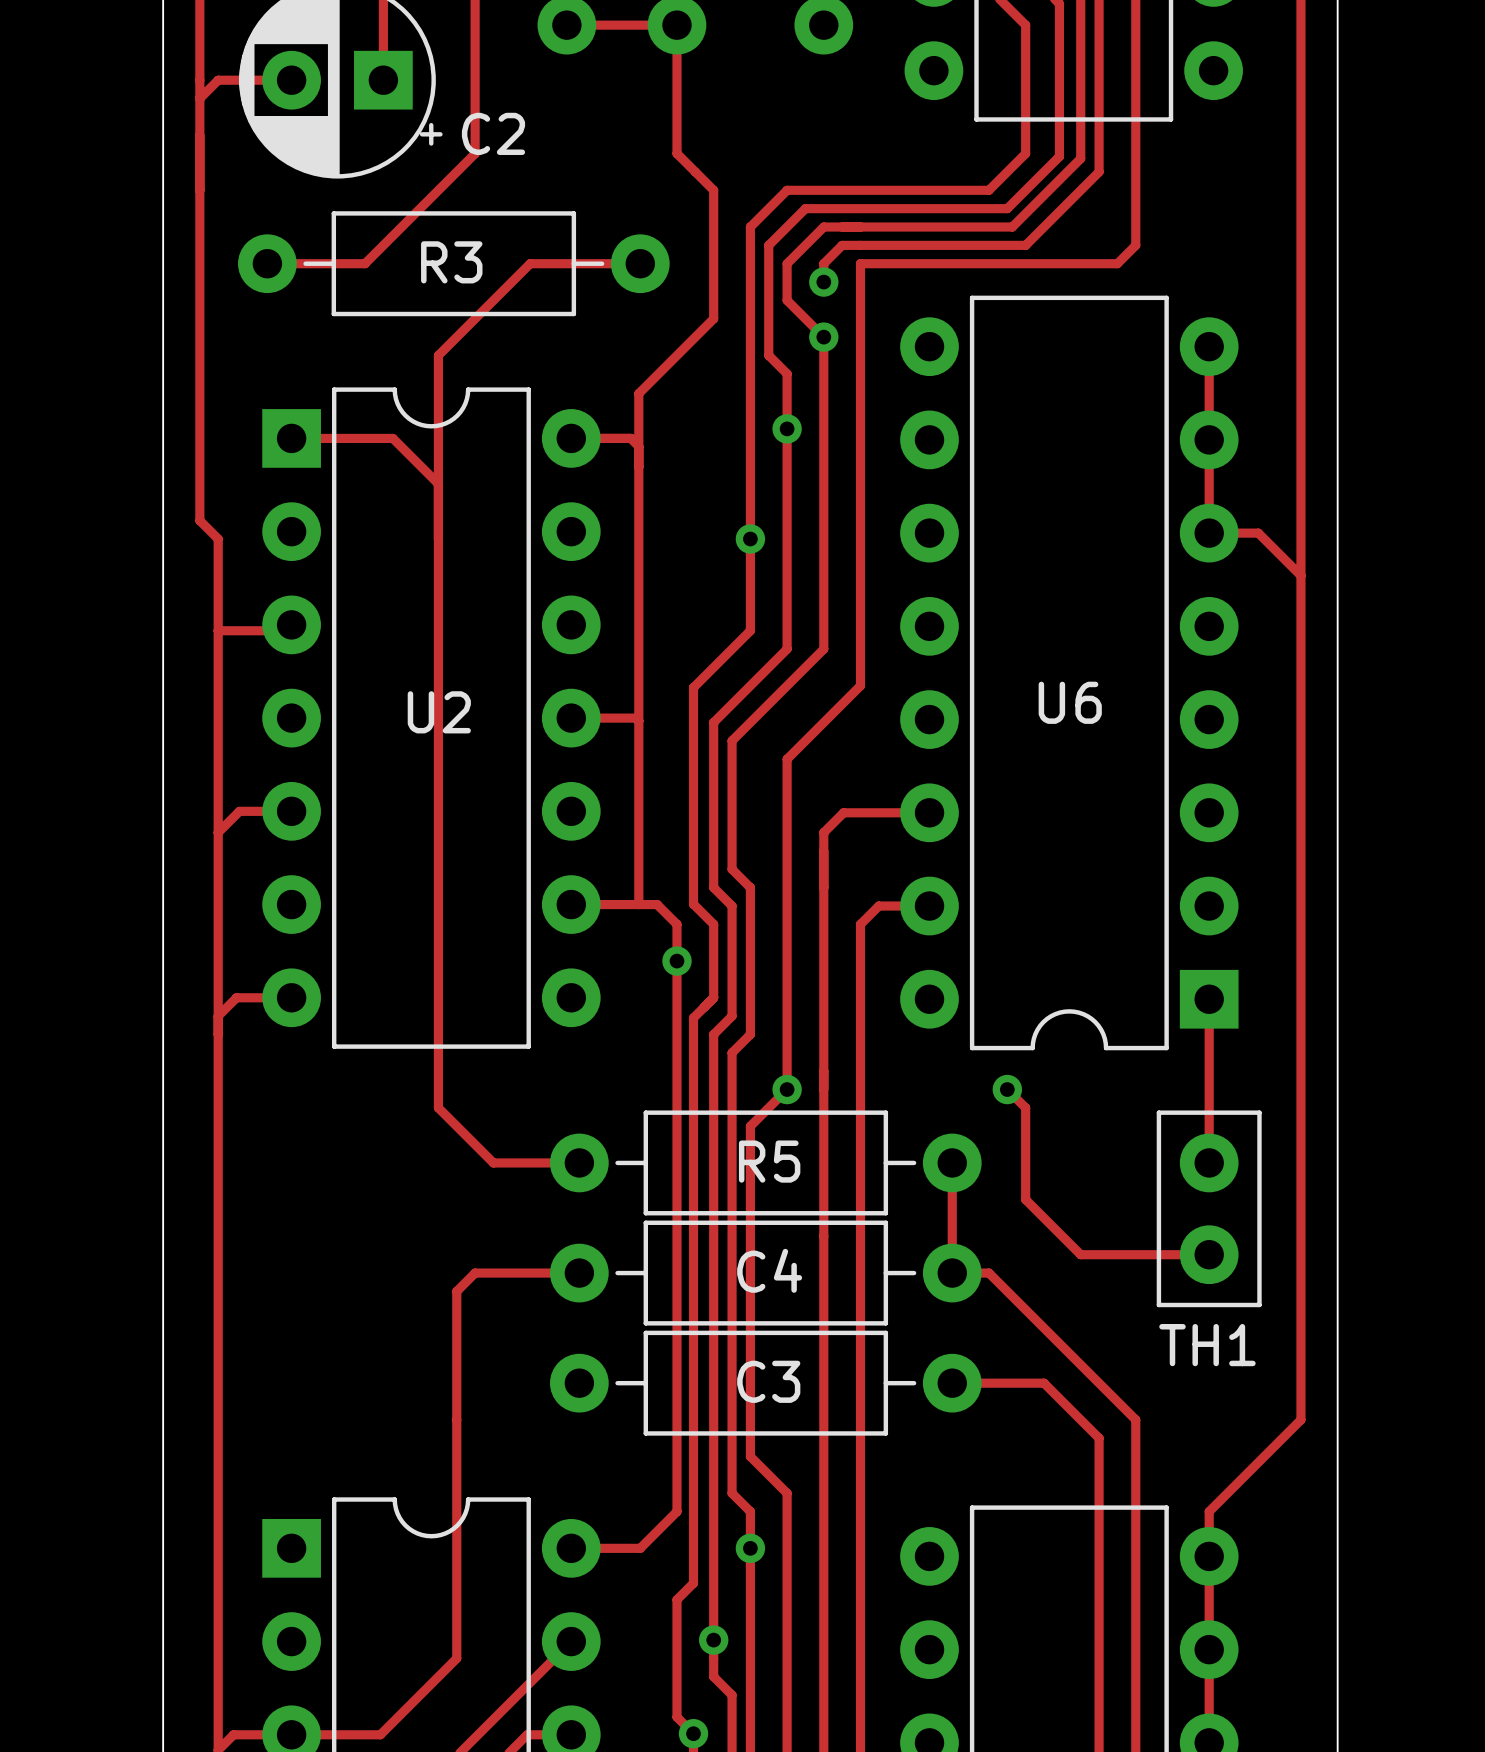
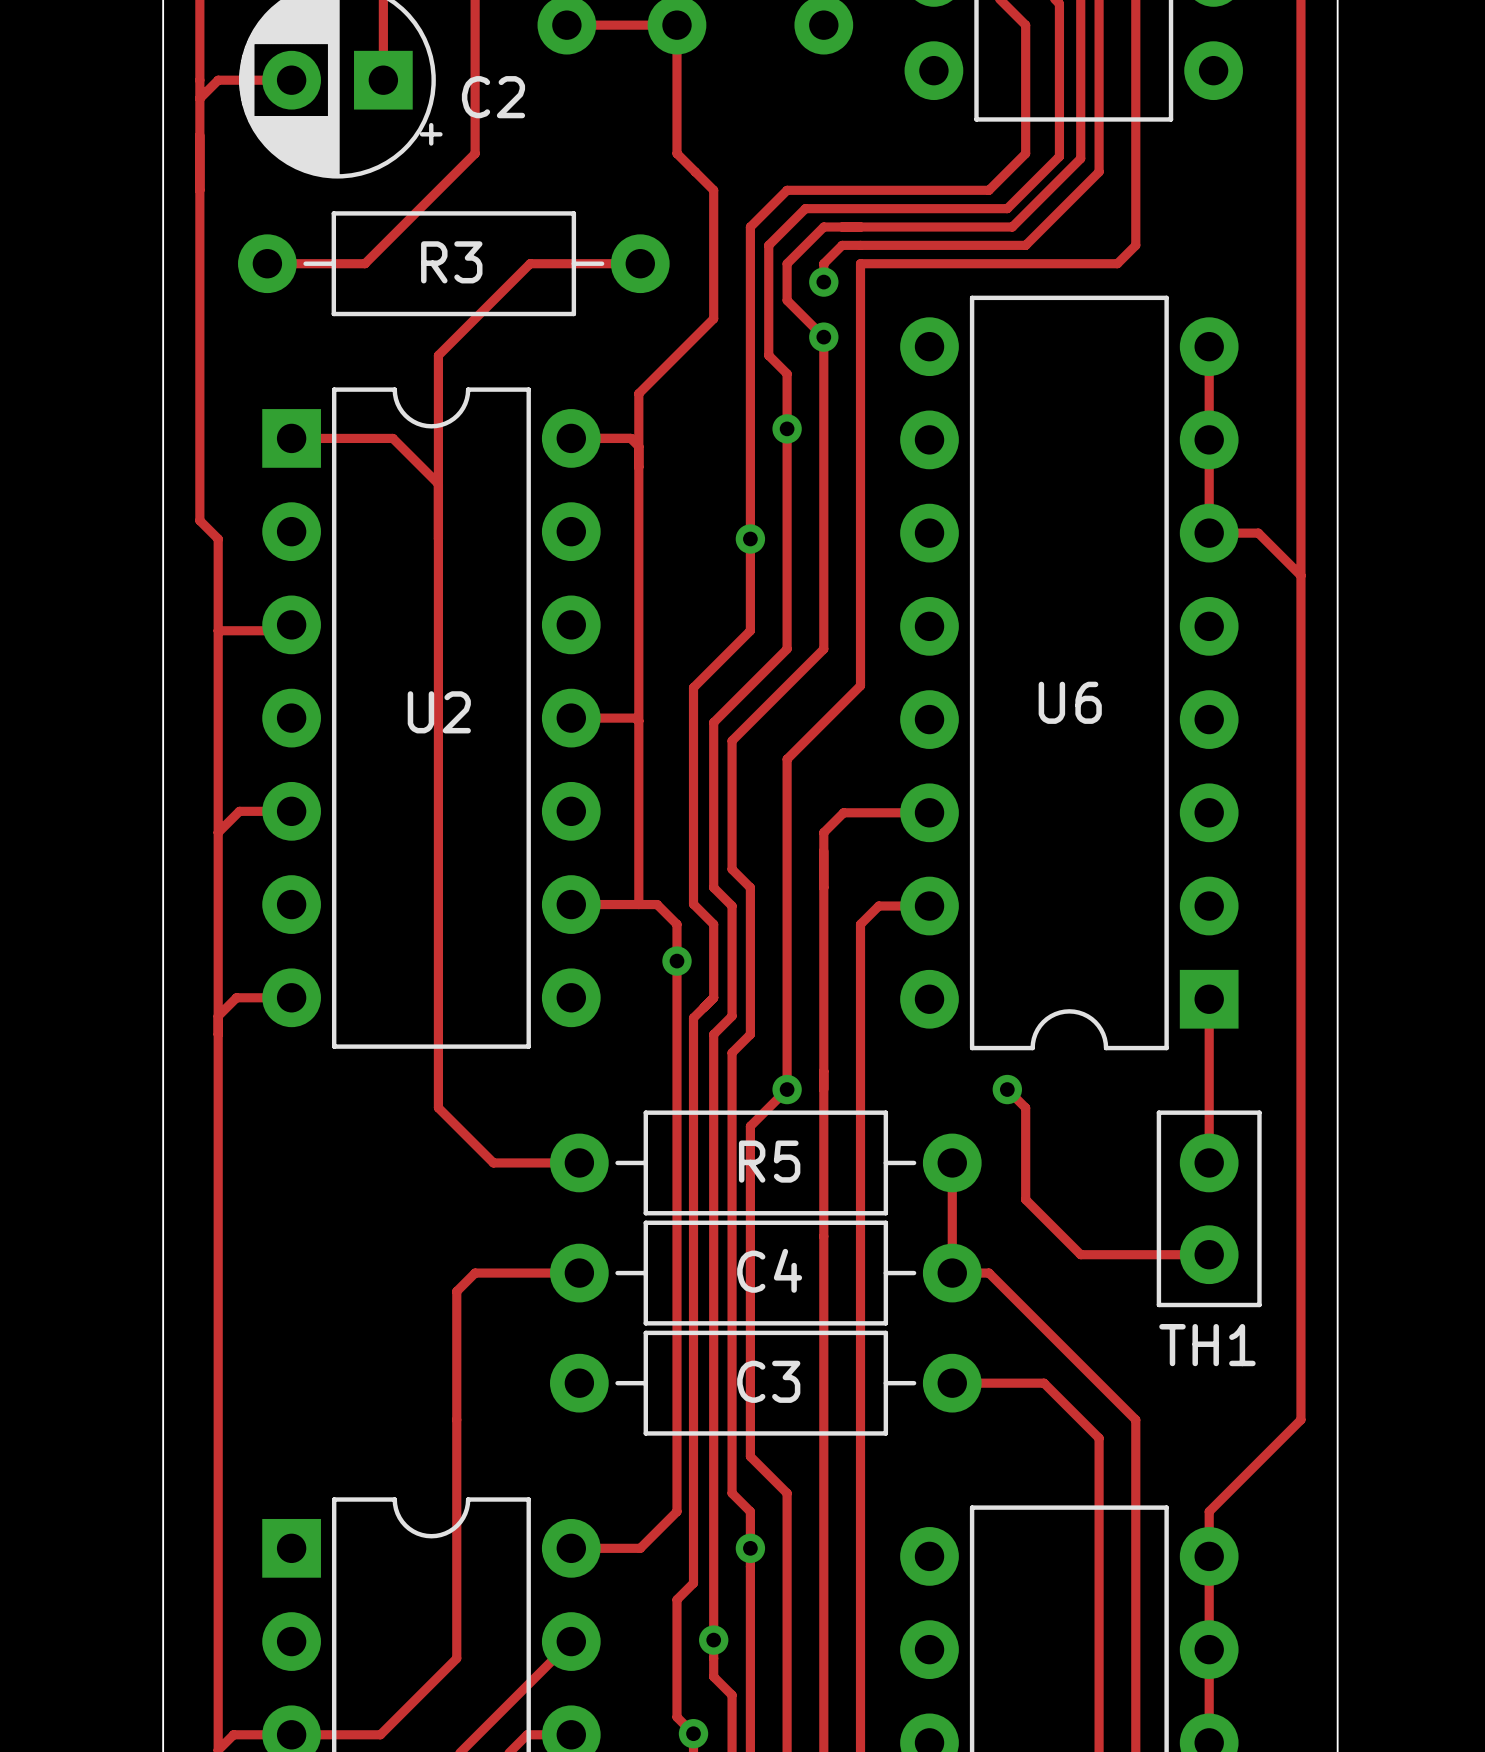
C2 name position: C2 (493, 133) -> C2 (493, 97)

